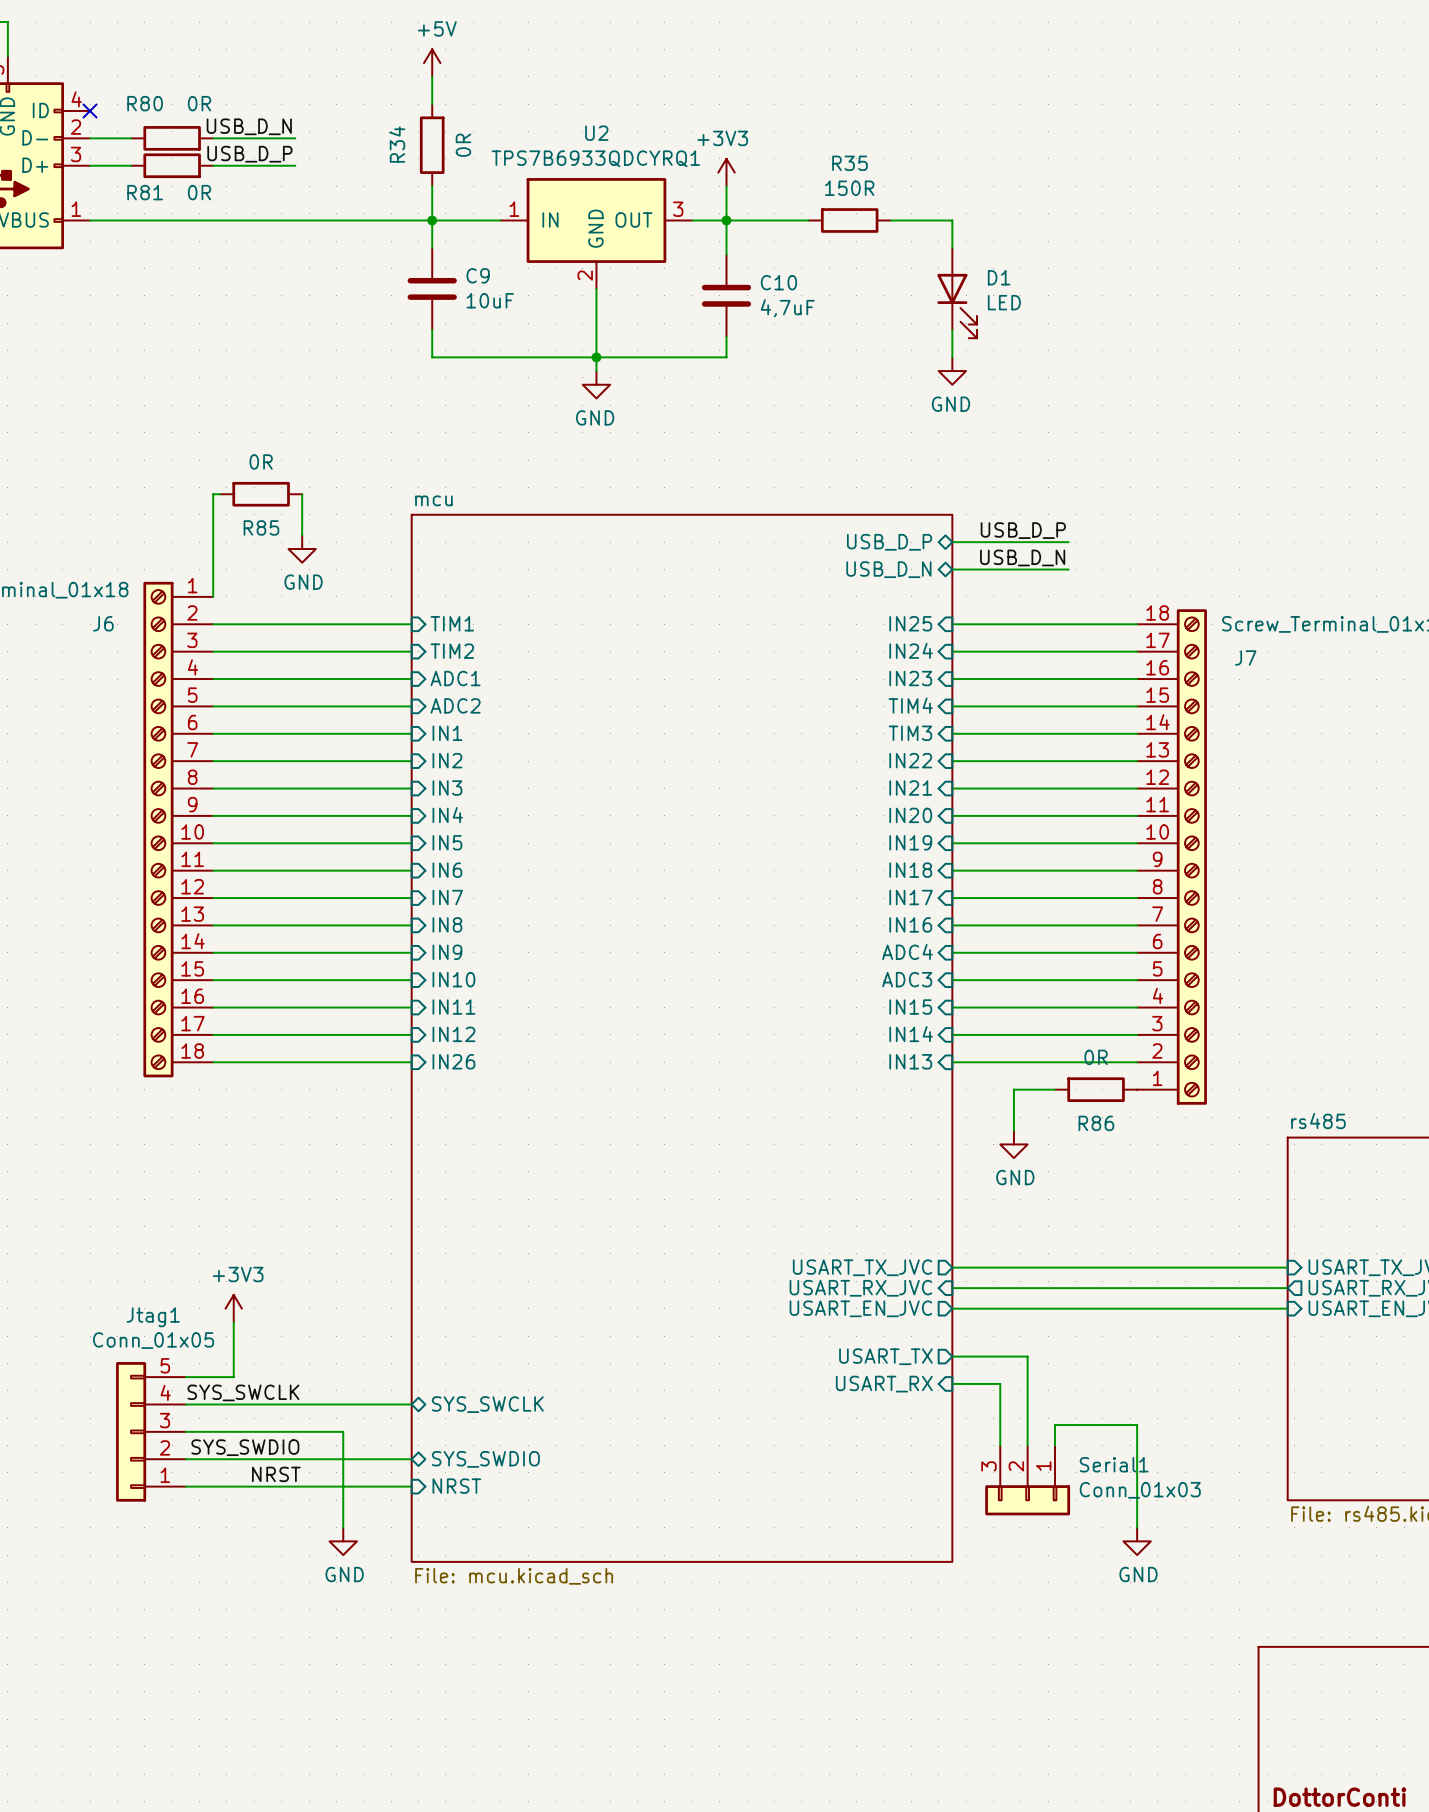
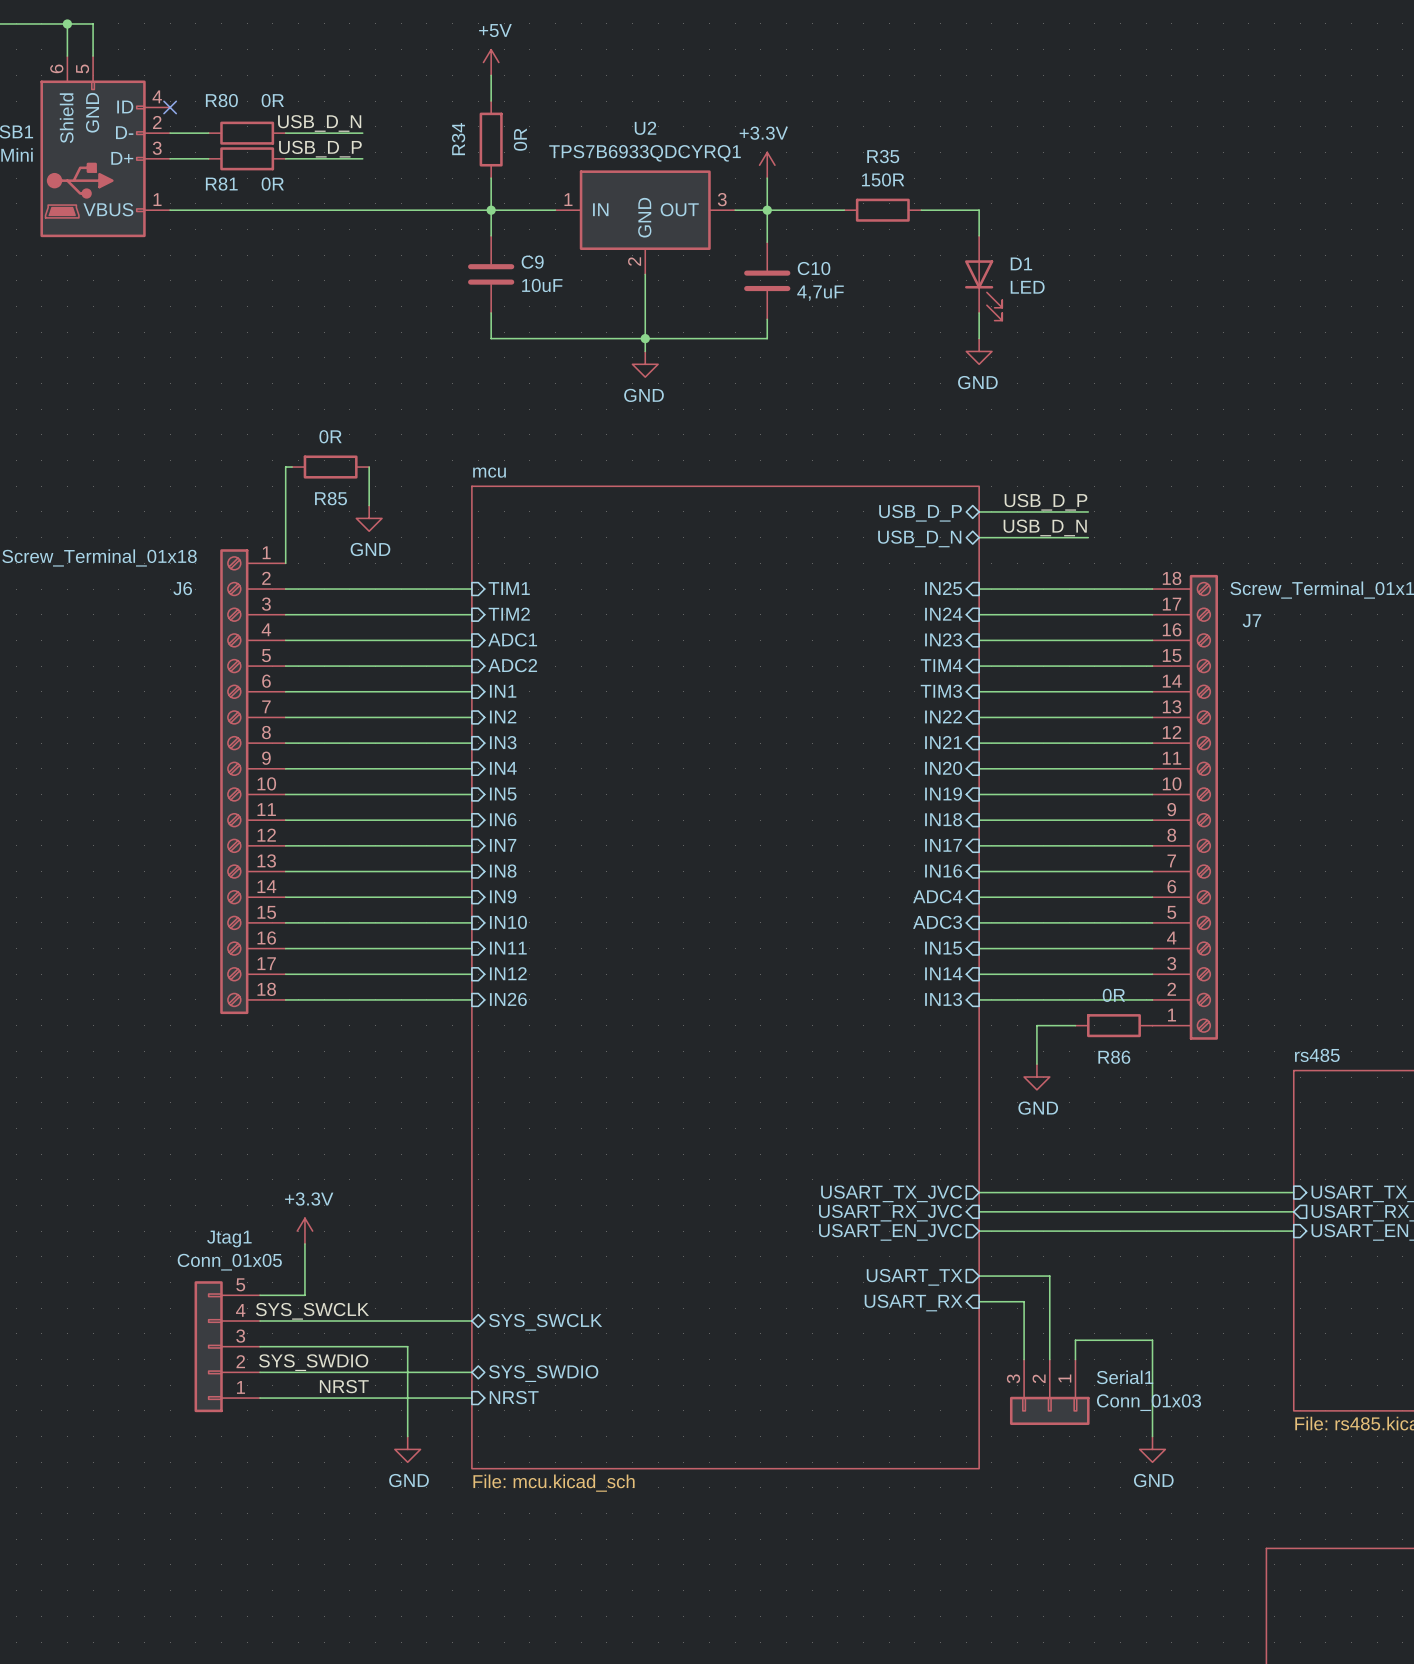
power symbol: +3V3 (726, 172) -> +3.3V (767, 165)
power symbol: +3V3 (233, 1308) -> +3.3V (304, 1231)

